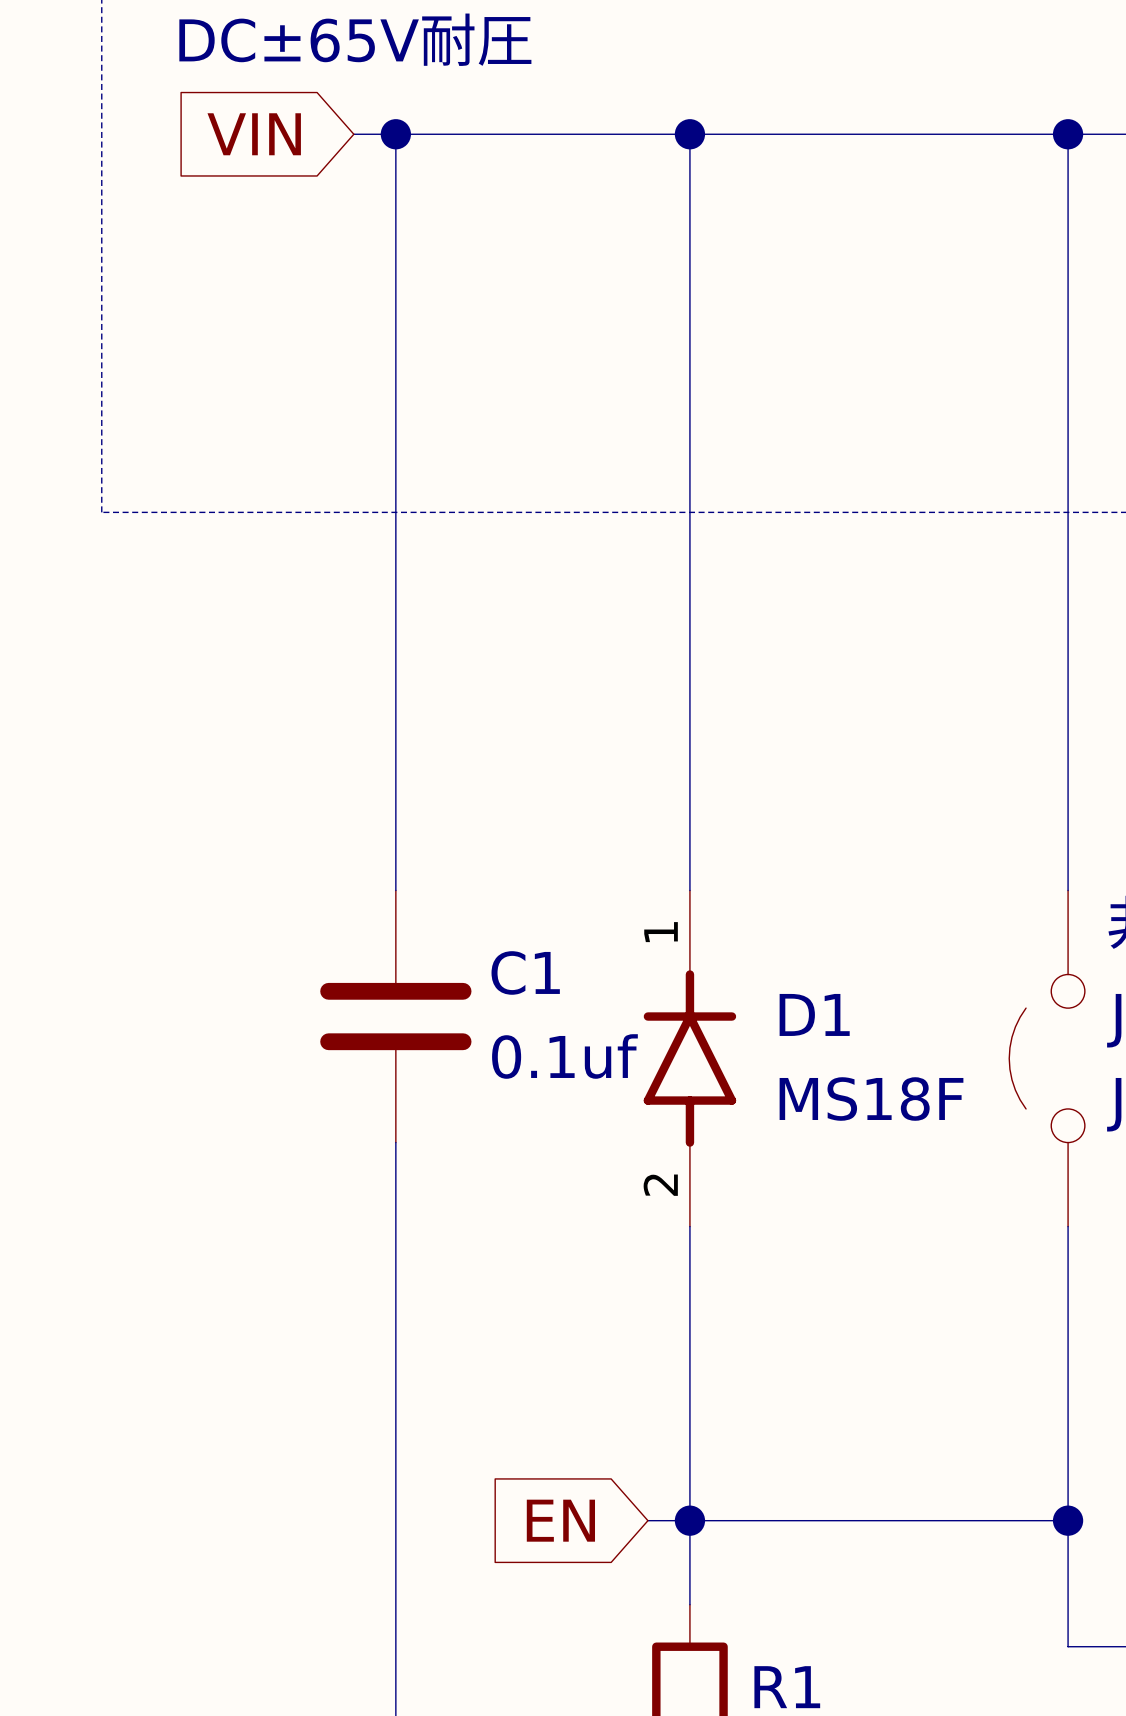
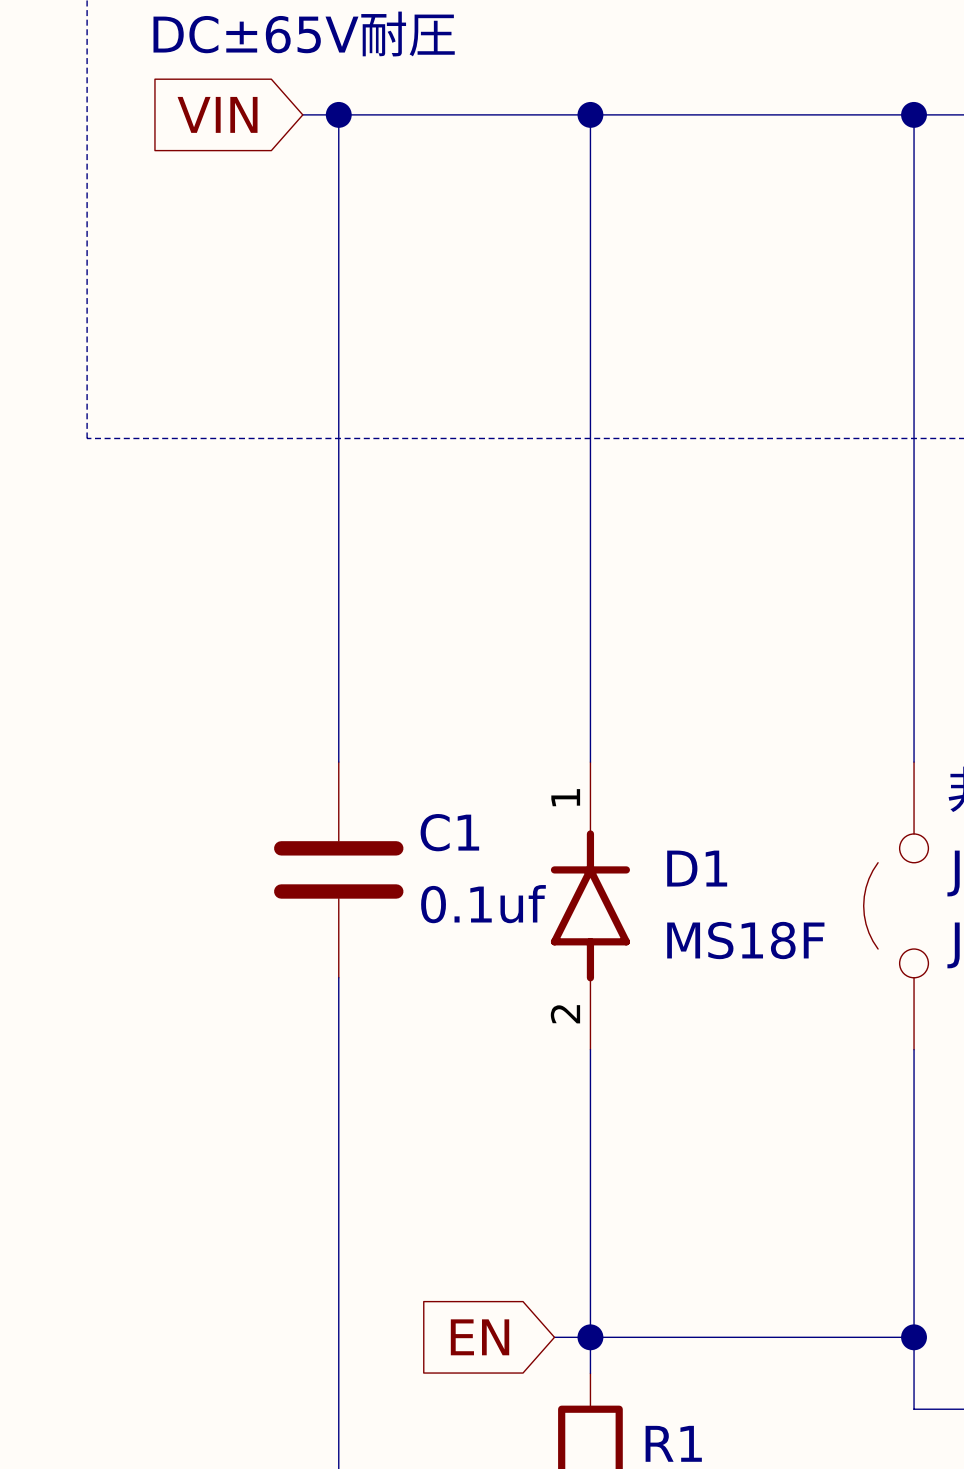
global label position: EN (560, 1520) -> EN (480, 1337)
wire: (647, 1520) (1068, 1520) -> (554, 1337) (914, 1337)
junction position: (689, 1520) -> (590, 1337)
junction position: (1068, 1520) -> (914, 1337)

